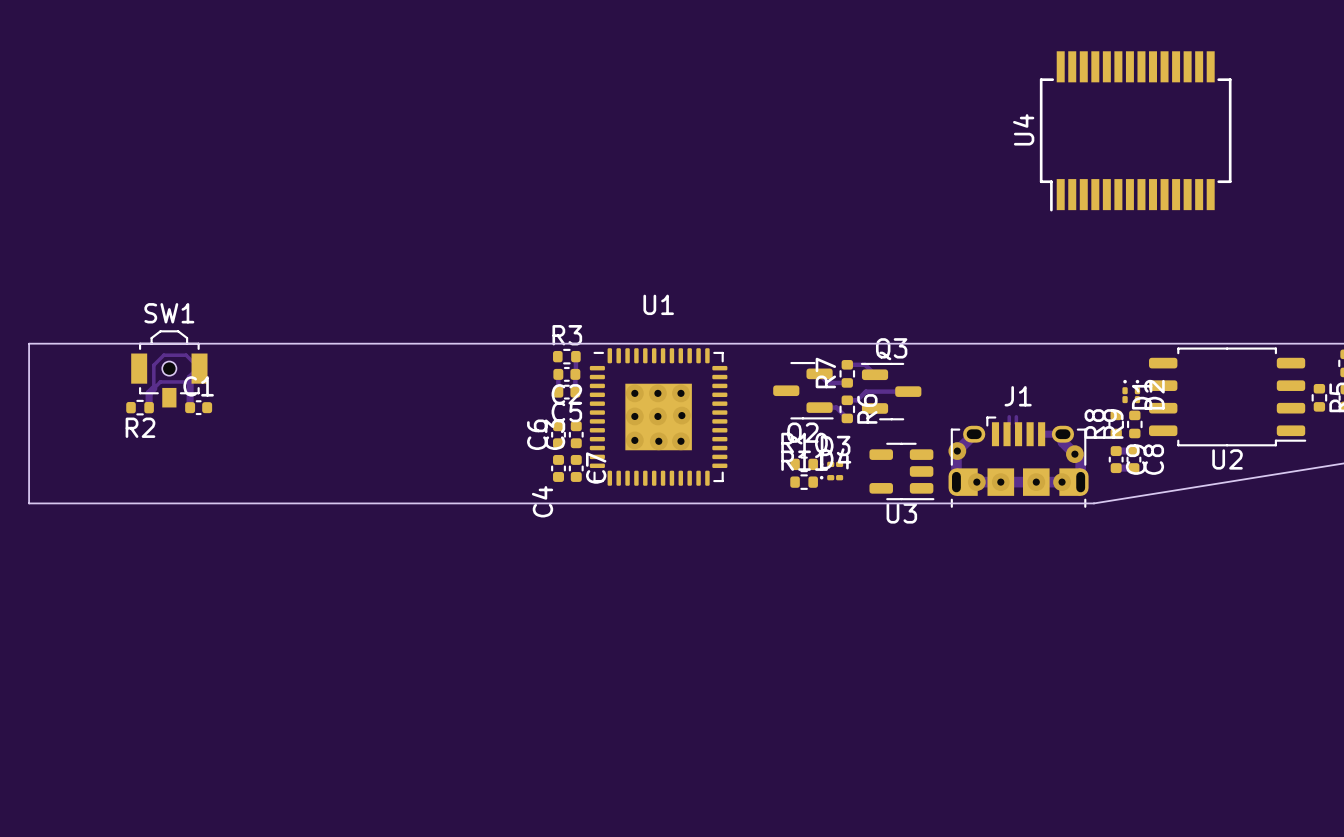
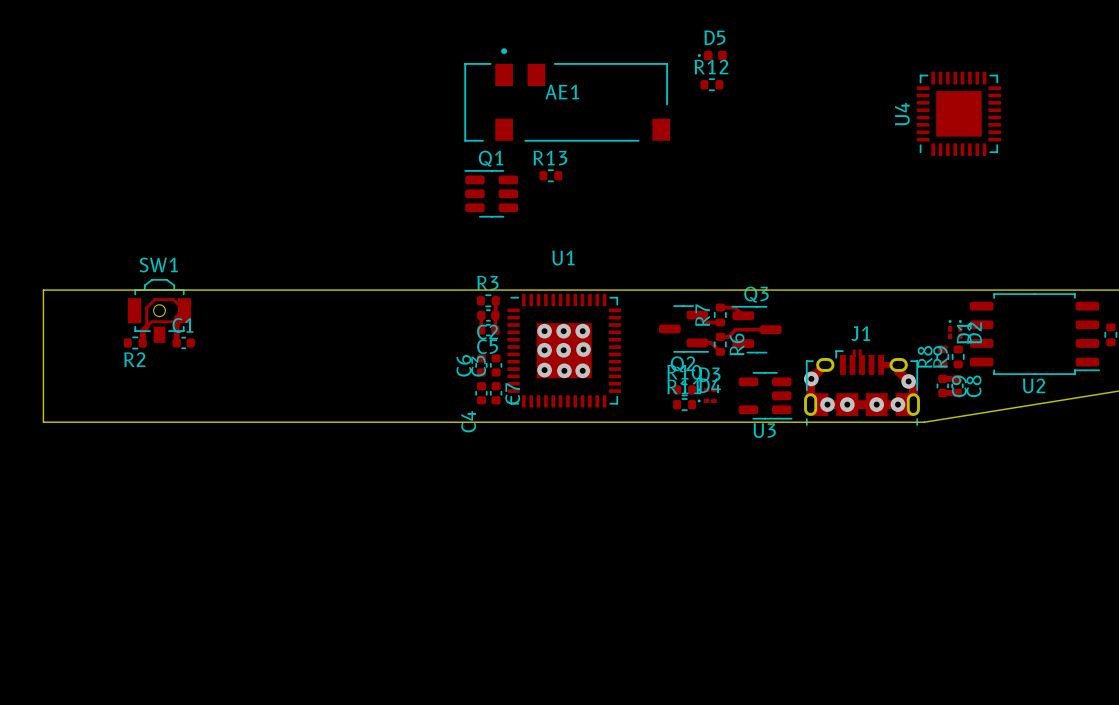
U4 footprint: [1039, 51, 1232, 212] -> [916, 71, 1002, 157]
D5: none -> (712, 55)
R12: none -> (711, 84)
AE1: none -> (567, 94)
U4 name position: U4 (1023, 129) -> U4 (902, 114)
R13: none -> (550, 175)
Q1: none -> (491, 193)

